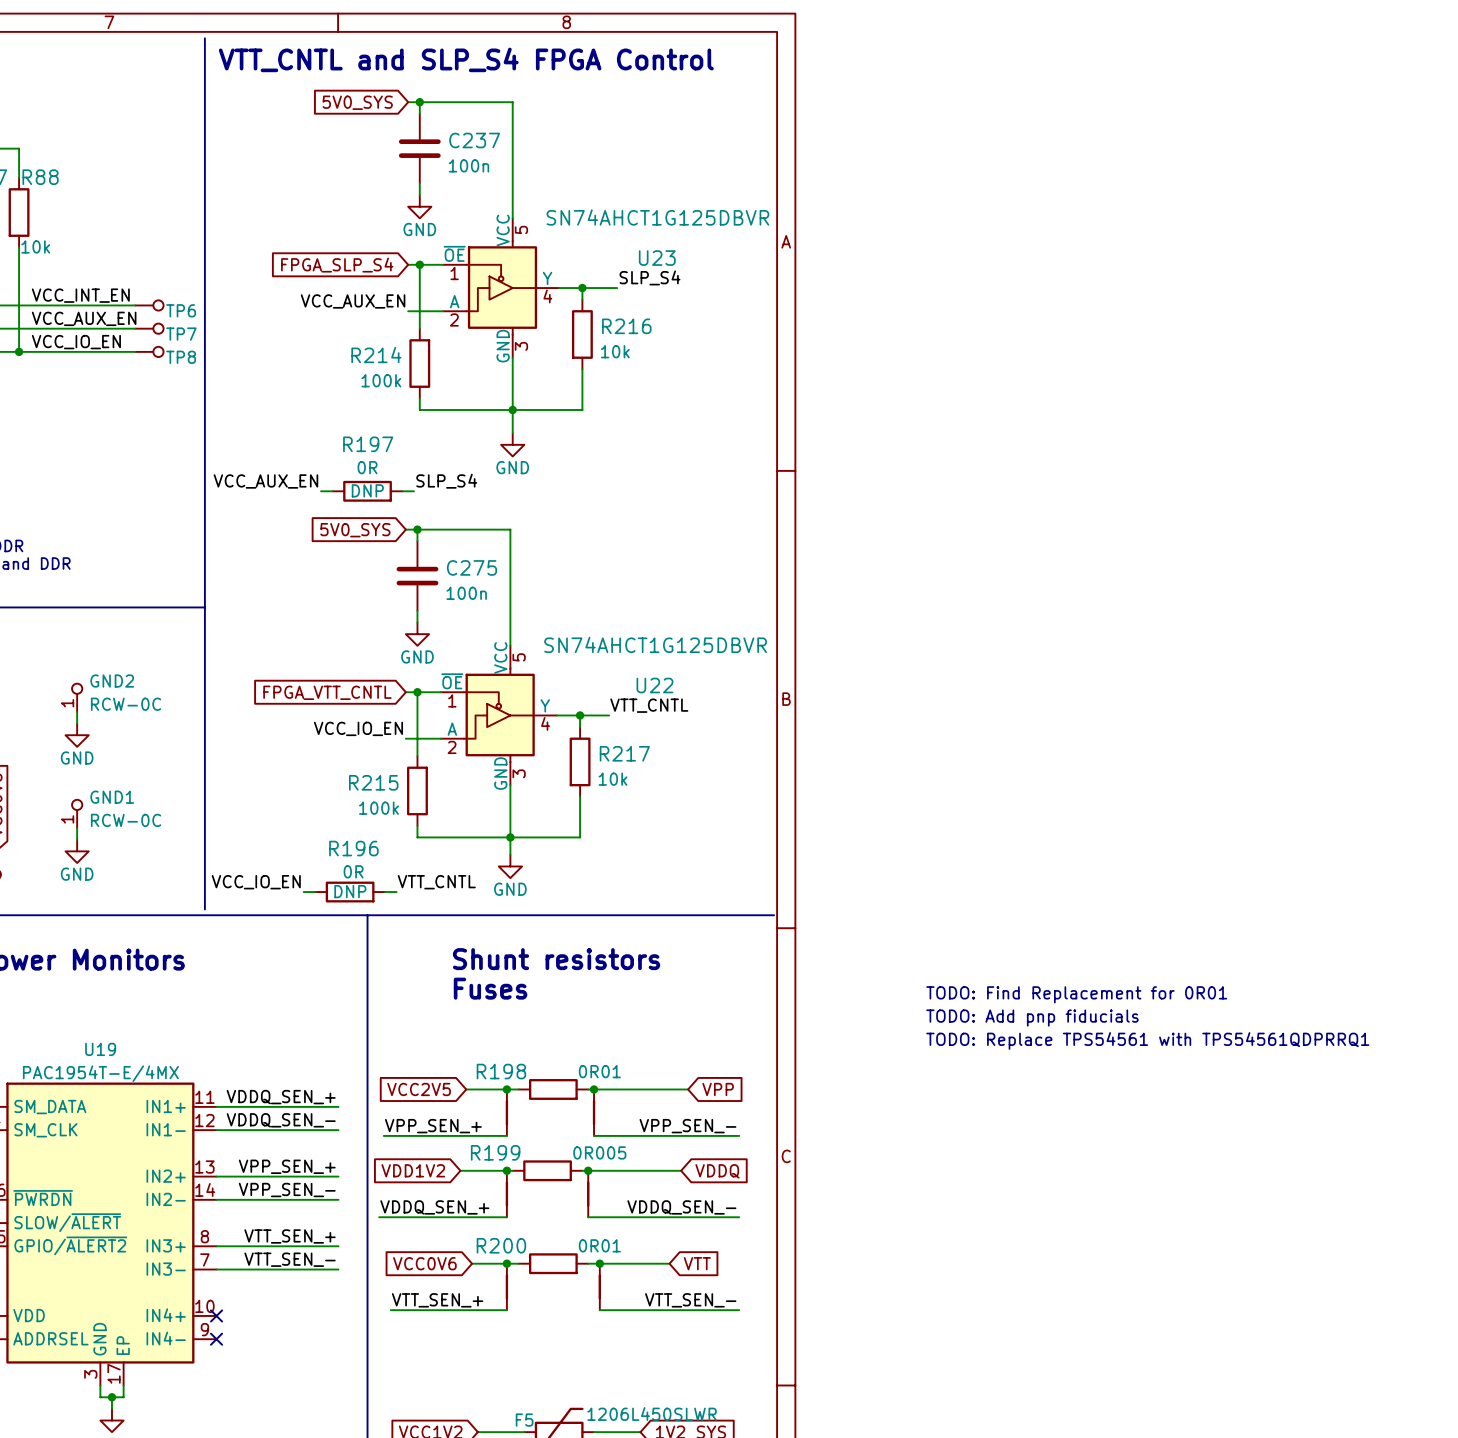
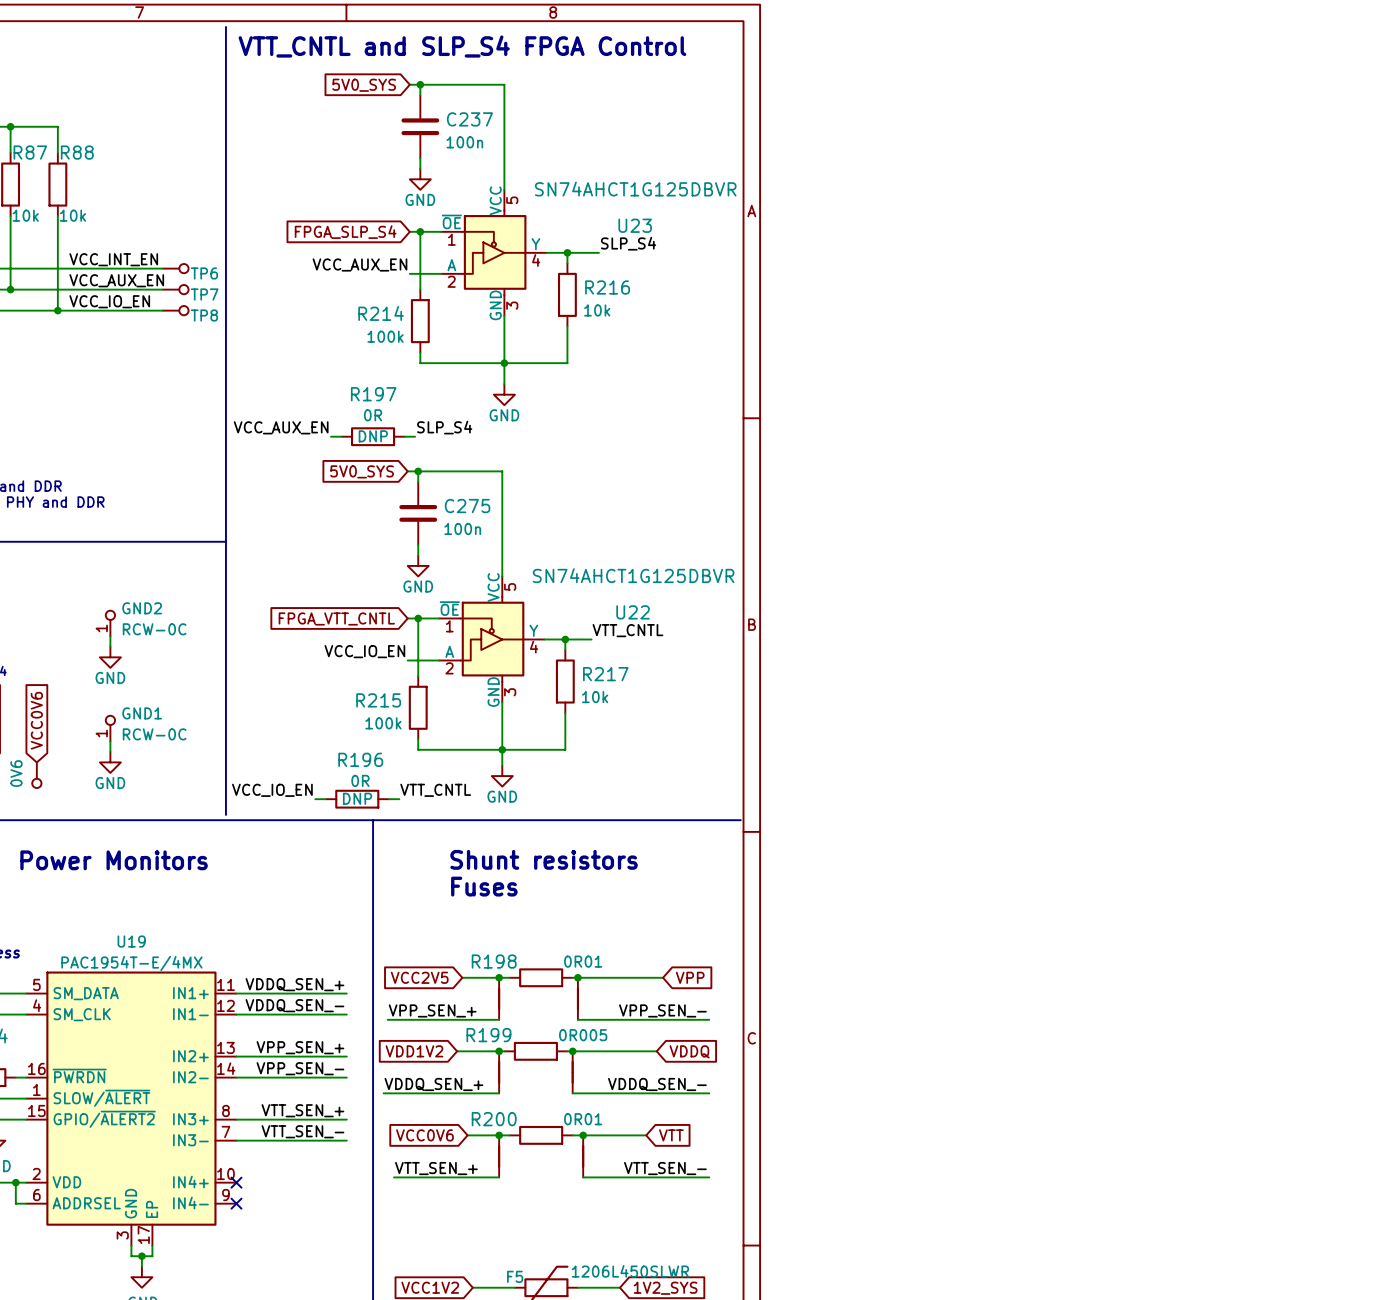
text: TODO: Find Replacement for 0R01 (1076, 994) -> none
text: TODO: Add pnp fiducials (1032, 1018) -> none
text: TODO: Replace TPS54561 with TPS54561QDPRRQ1 (1147, 1040) -> none

